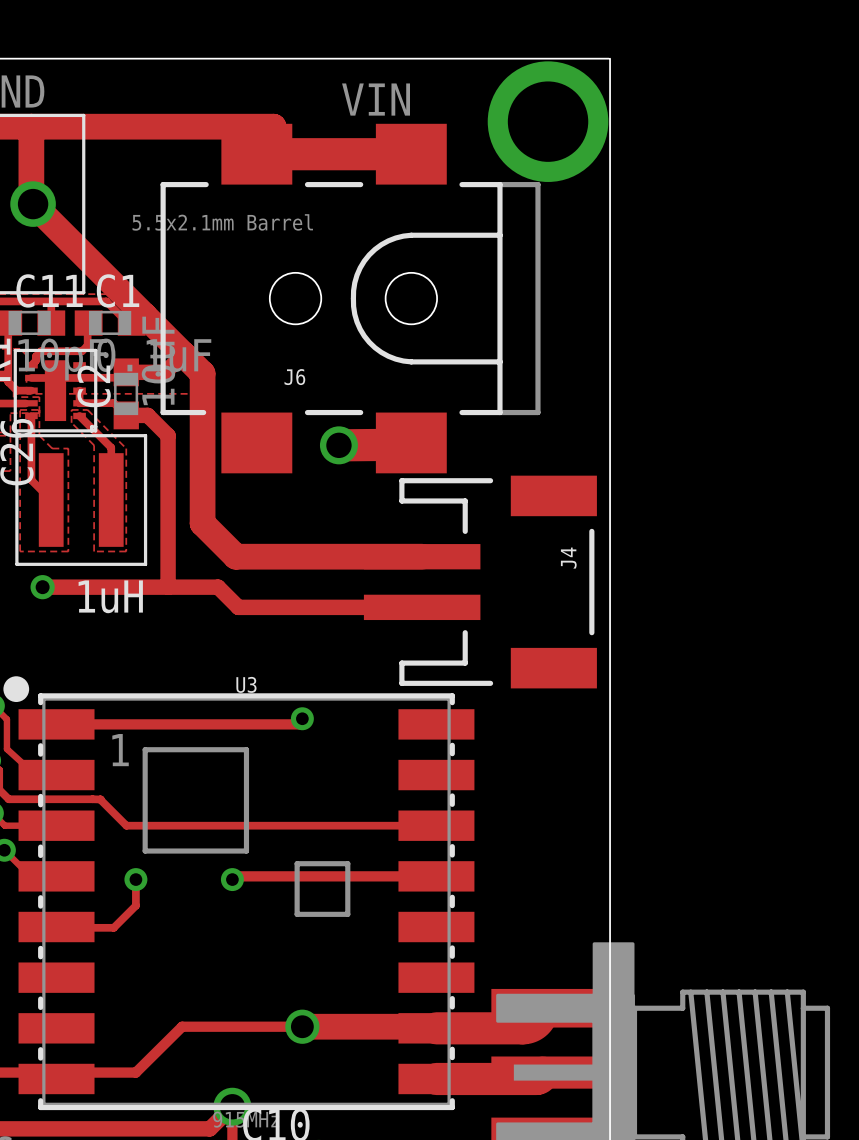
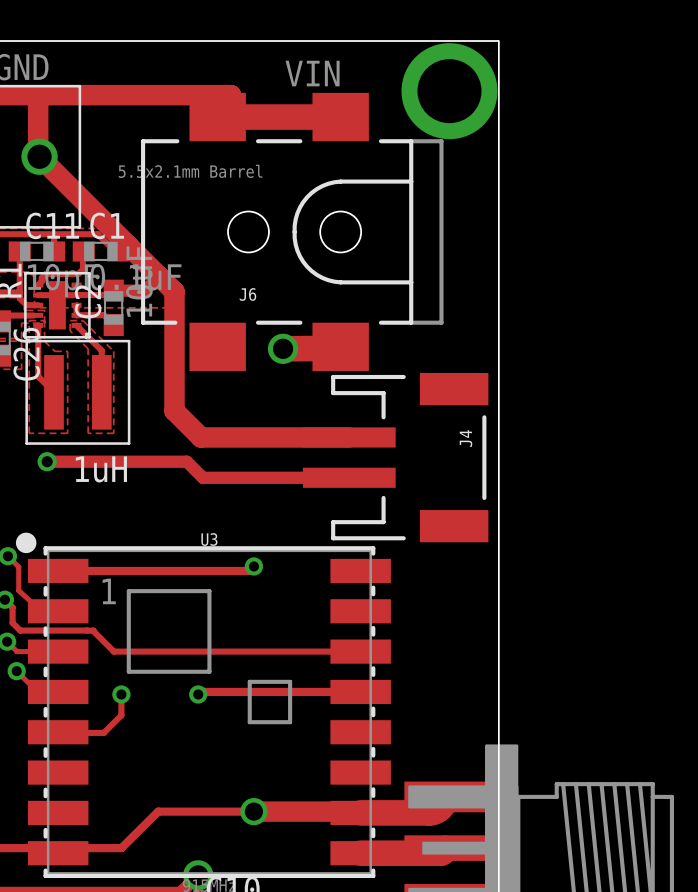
track: (126, 415) (147, 415) (168, 435) (168, 587) -> none

